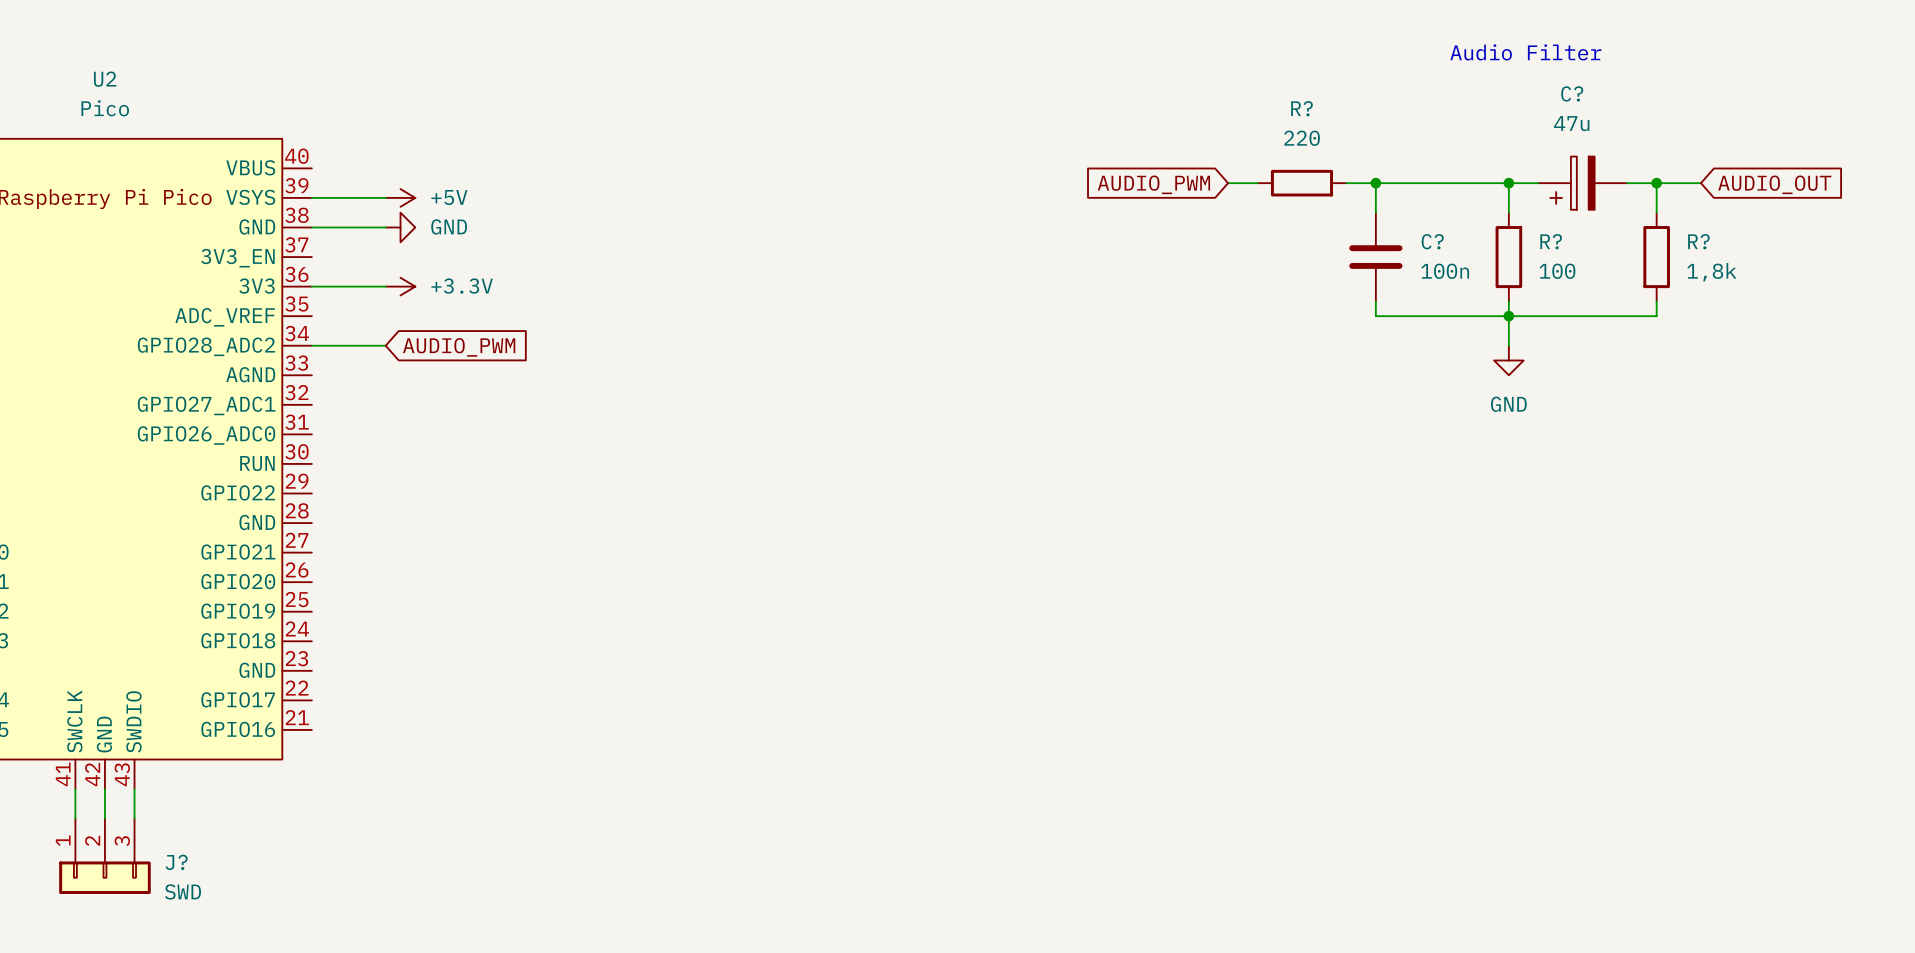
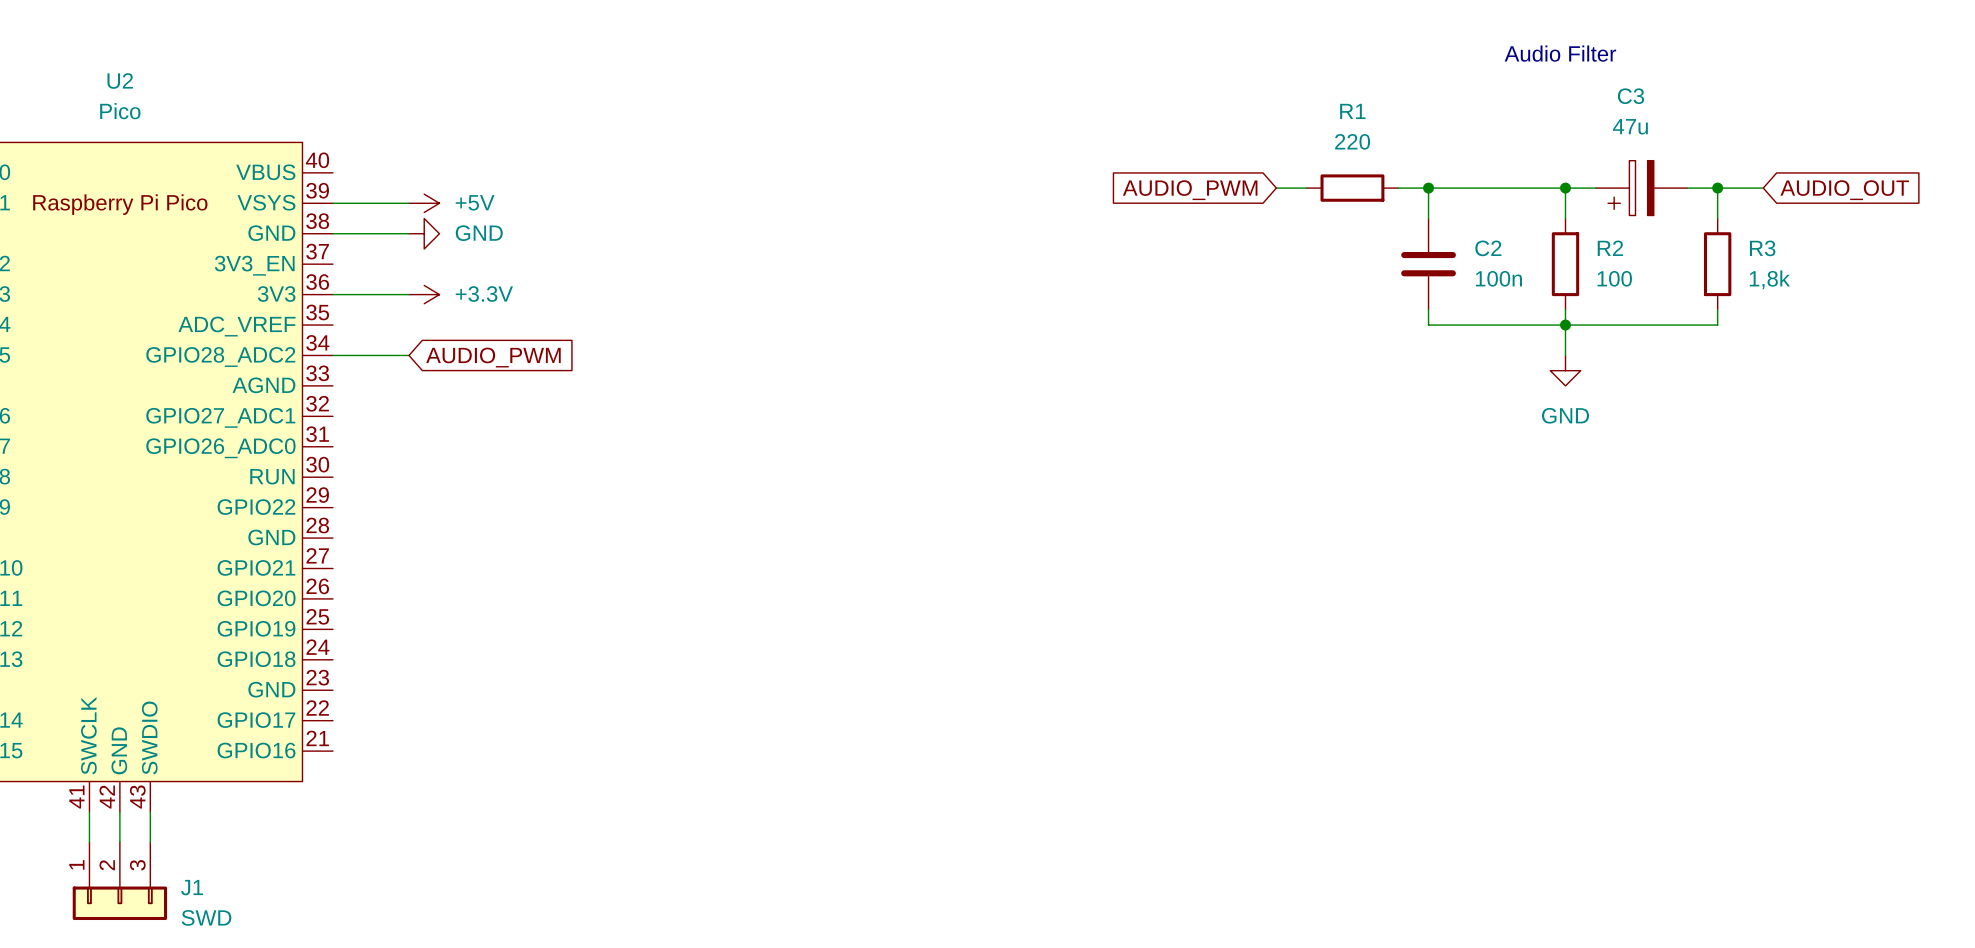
C? name: C? (1572, 93) -> C3 (1631, 96)
R? name: R? (1301, 108) -> R1 (1352, 111)
C? name: C? (1432, 241) -> C2 (1488, 248)
R? name: R? (1551, 241) -> R2 (1610, 248)
R? name: R? (1698, 241) -> R3 (1762, 248)
J? name: J? (176, 862) -> J1 (192, 887)

